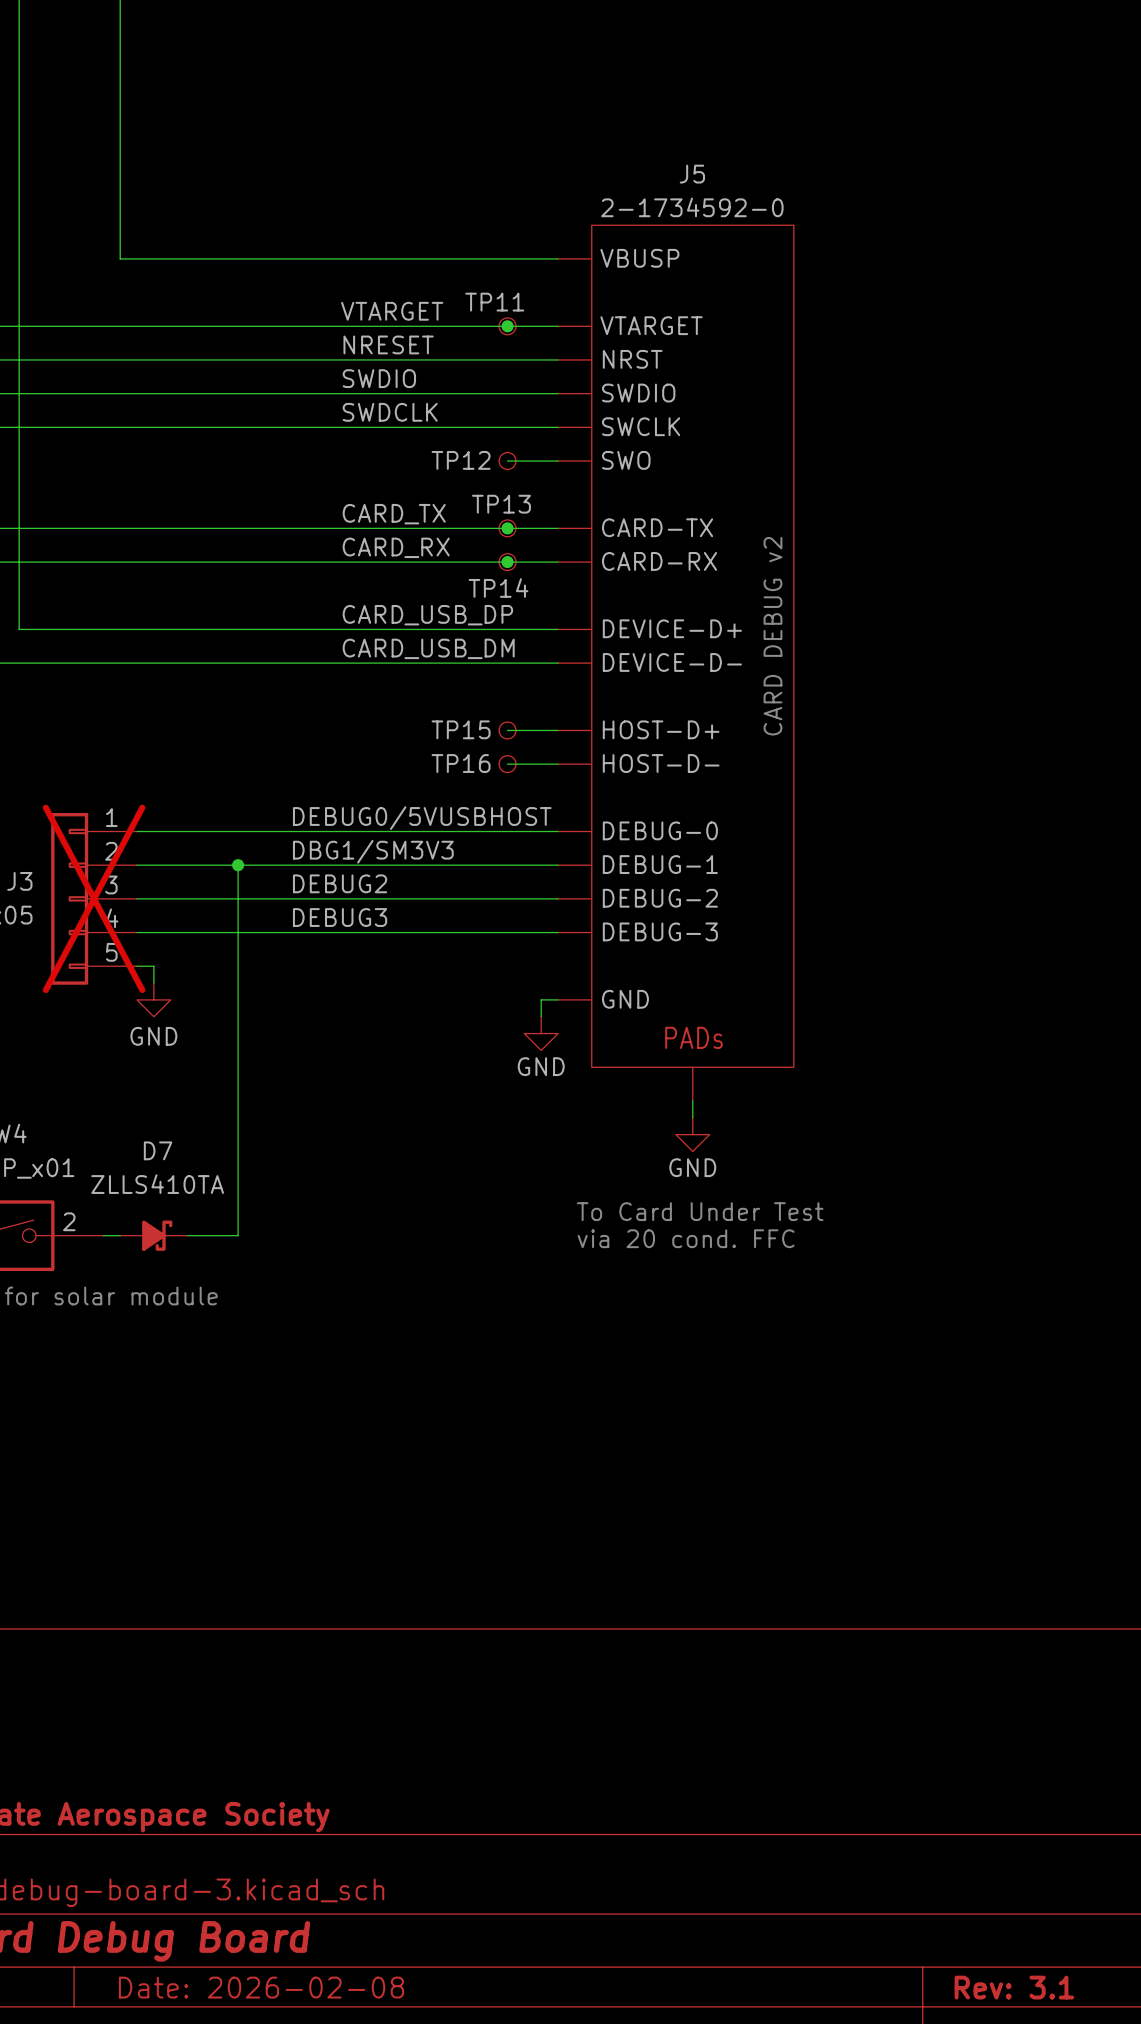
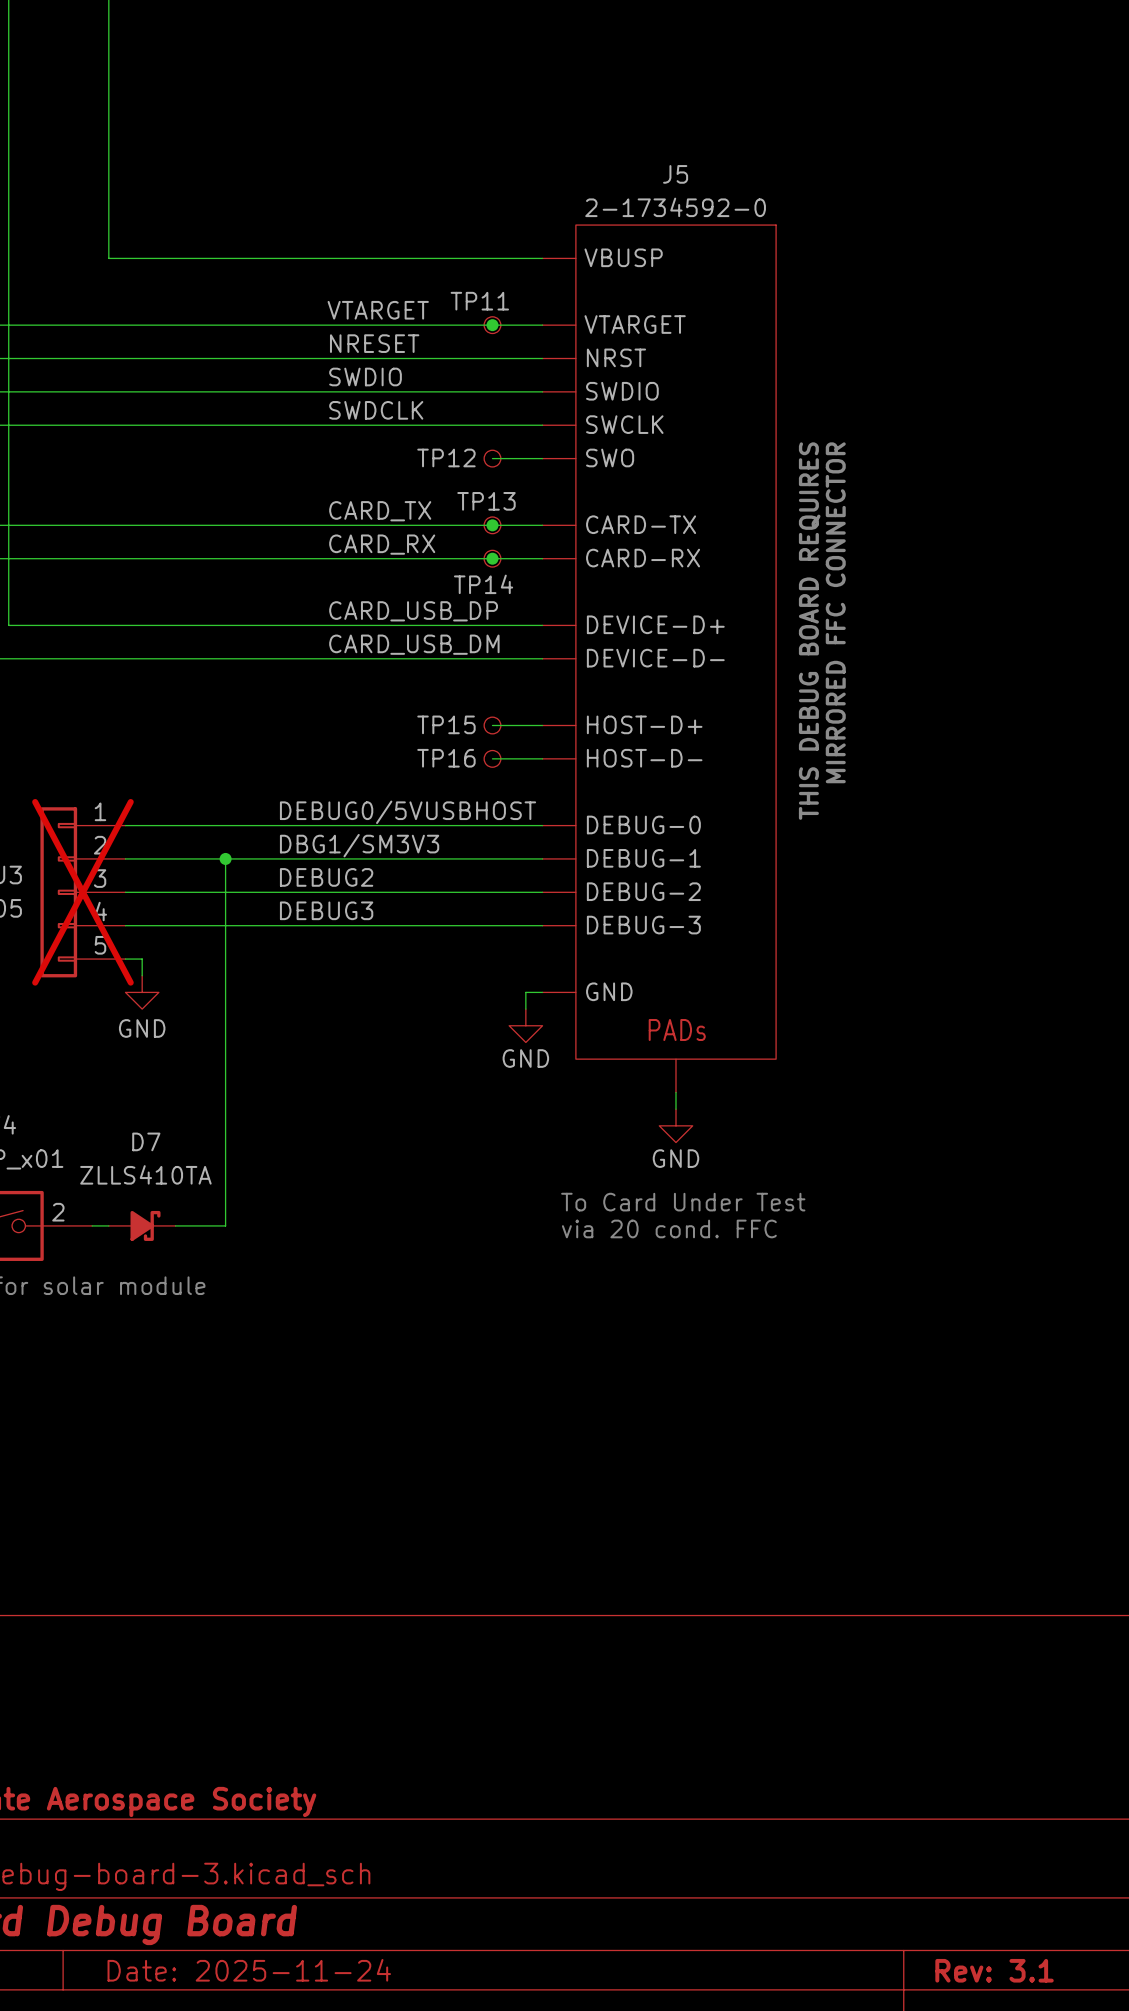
text: none -> MIRRORED FFC CONNECTOR (835, 612)
text: none -> THIS DEBUG BOARD REQUIRES (809, 631)
text: CARD DEBUG v2 (772, 636) -> none
title block: Date: 2026-02-08 (261, 1987) -> Date: 2025-11-24 (249, 1970)

